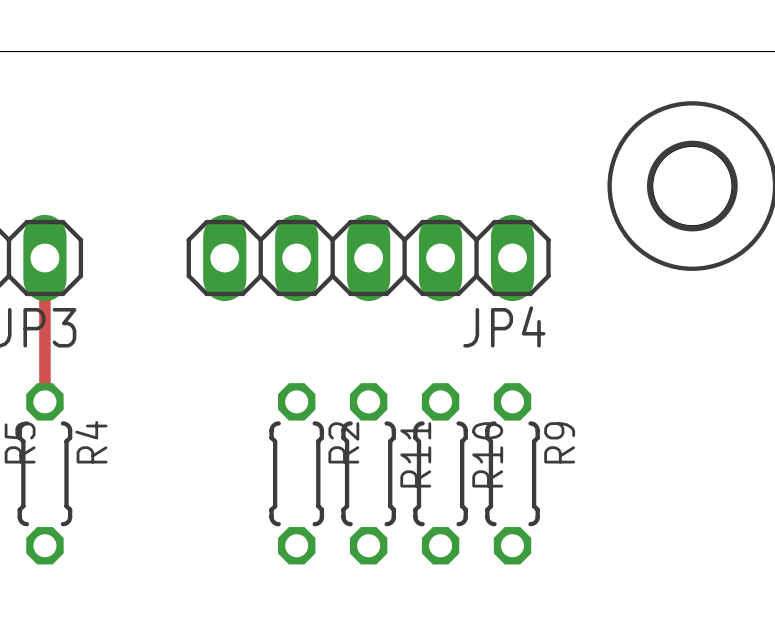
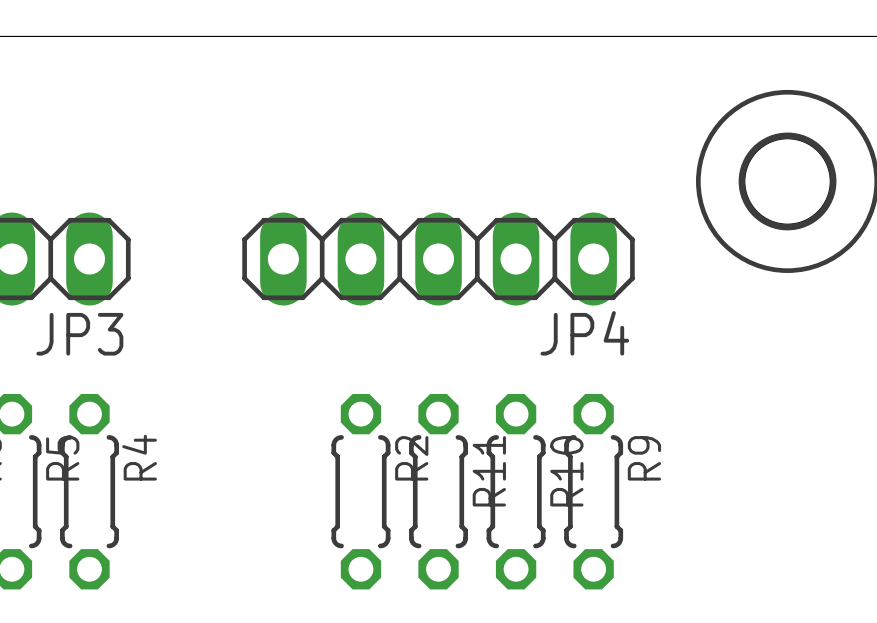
track: (44, 257) (44, 401) -> none

